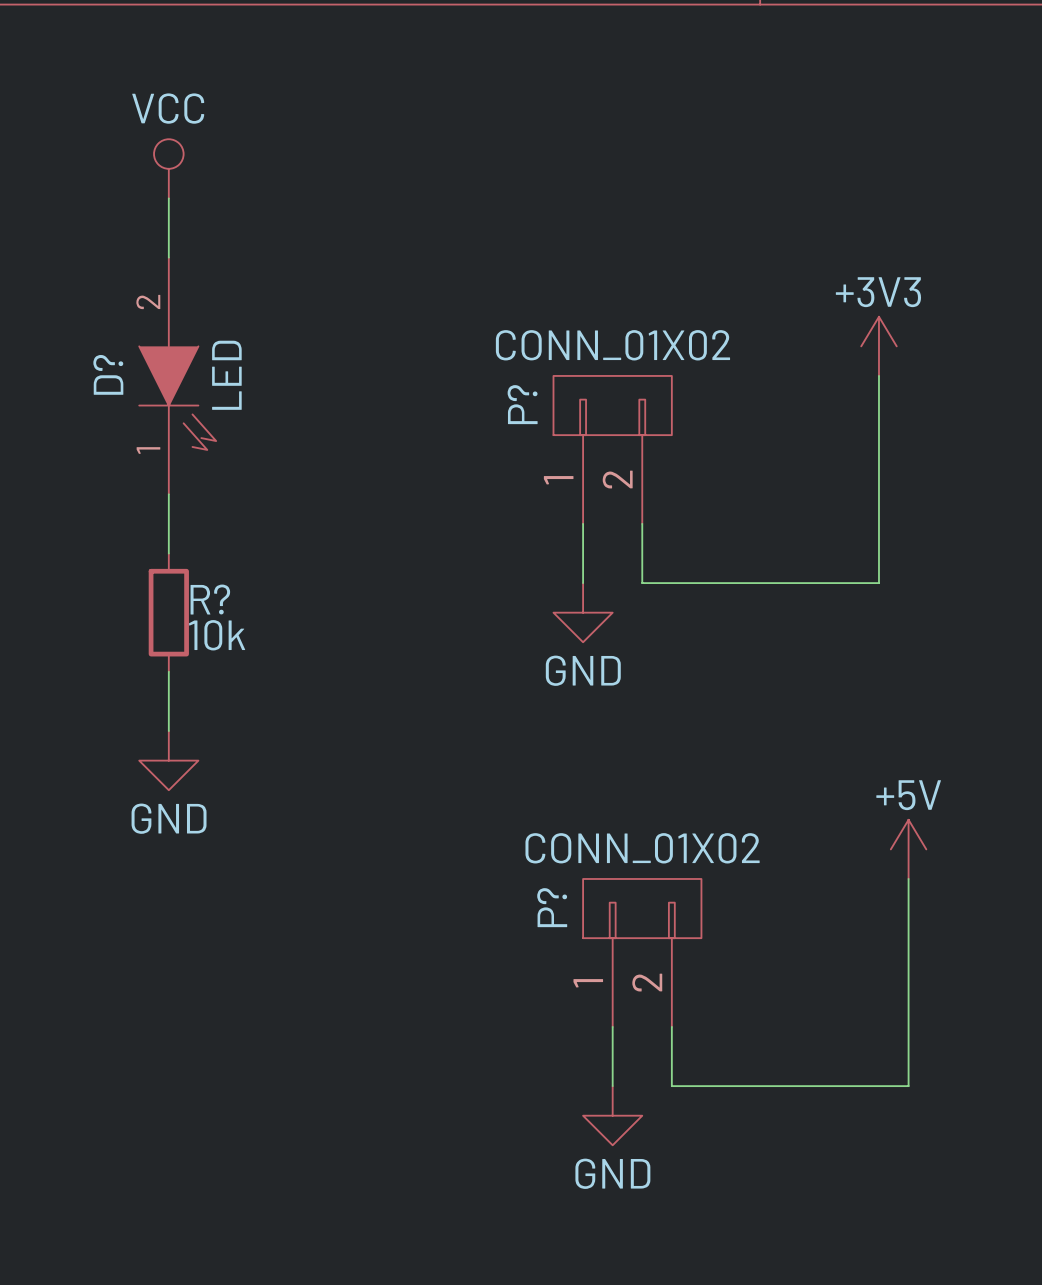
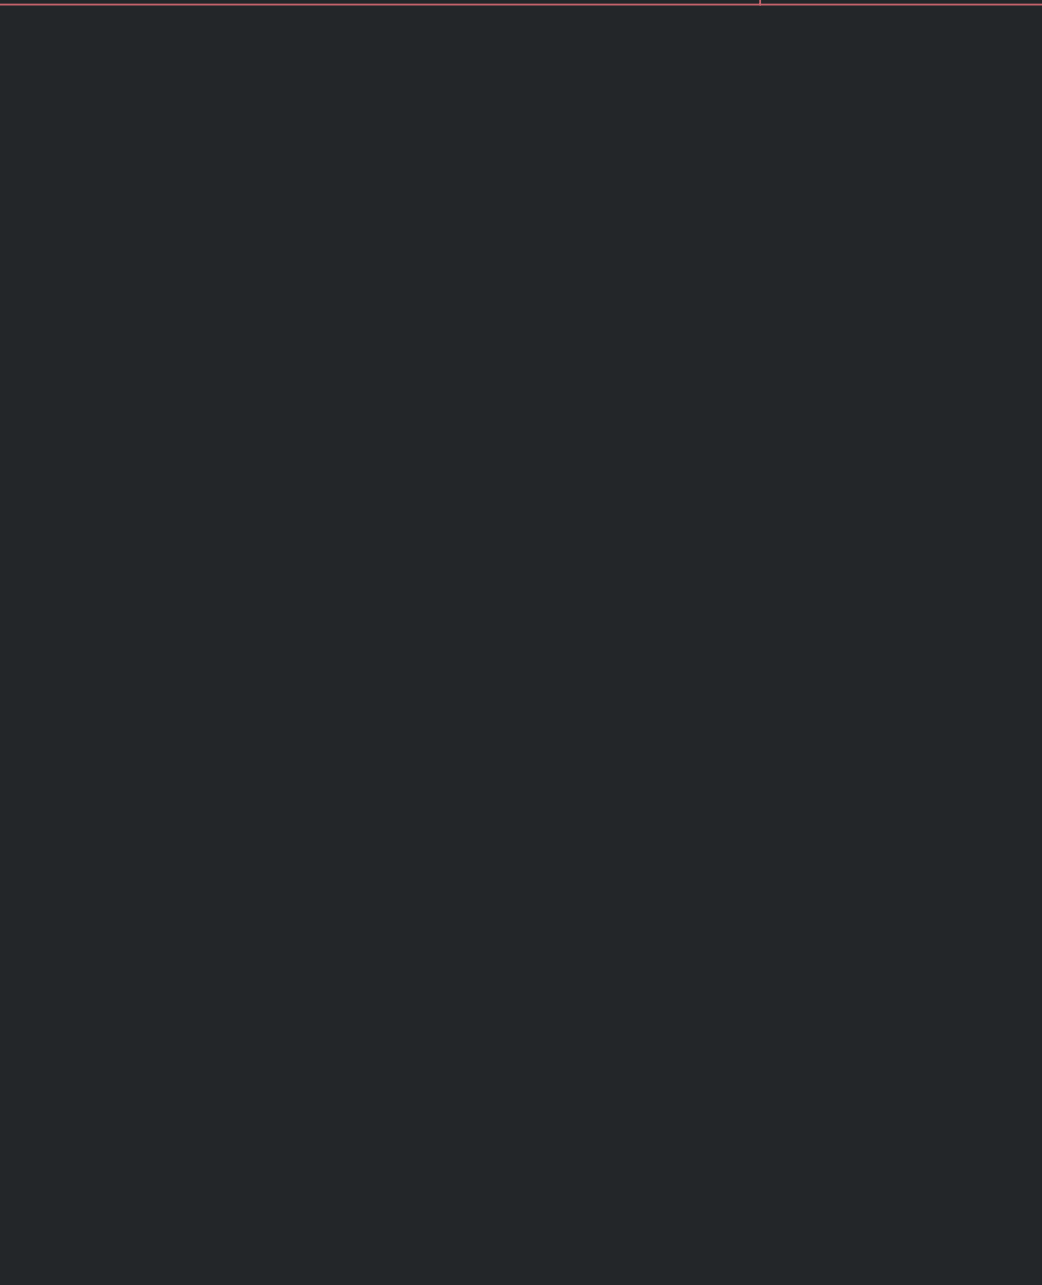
power symbol: VCC (168, 168) -> none
wire: (168, 198) (168, 257) -> none
power symbol: +3V3 (878, 346) -> none
D?: LED (177, 375) -> none
wire: (878, 375) (878, 583) (642, 583) (642, 523) -> none
P?: CONN_01X02 (612, 449) -> none
wire: (168, 494) (168, 553) -> none
wire: (583, 523) (583, 583) -> none
R?: 10k (168, 612) -> none
power symbol: GND (583, 612) -> none
wire: (168, 671) (168, 731) -> none
power symbol: GND (168, 760) -> none
power symbol: +5V (908, 849) -> none
wire: (908, 878) (908, 1086) (671, 1086) (671, 1026) -> none
P?: CONN_01X02 (642, 952) -> none
wire: (612, 1026) (612, 1086) -> none
power symbol: GND (612, 1115) -> none

